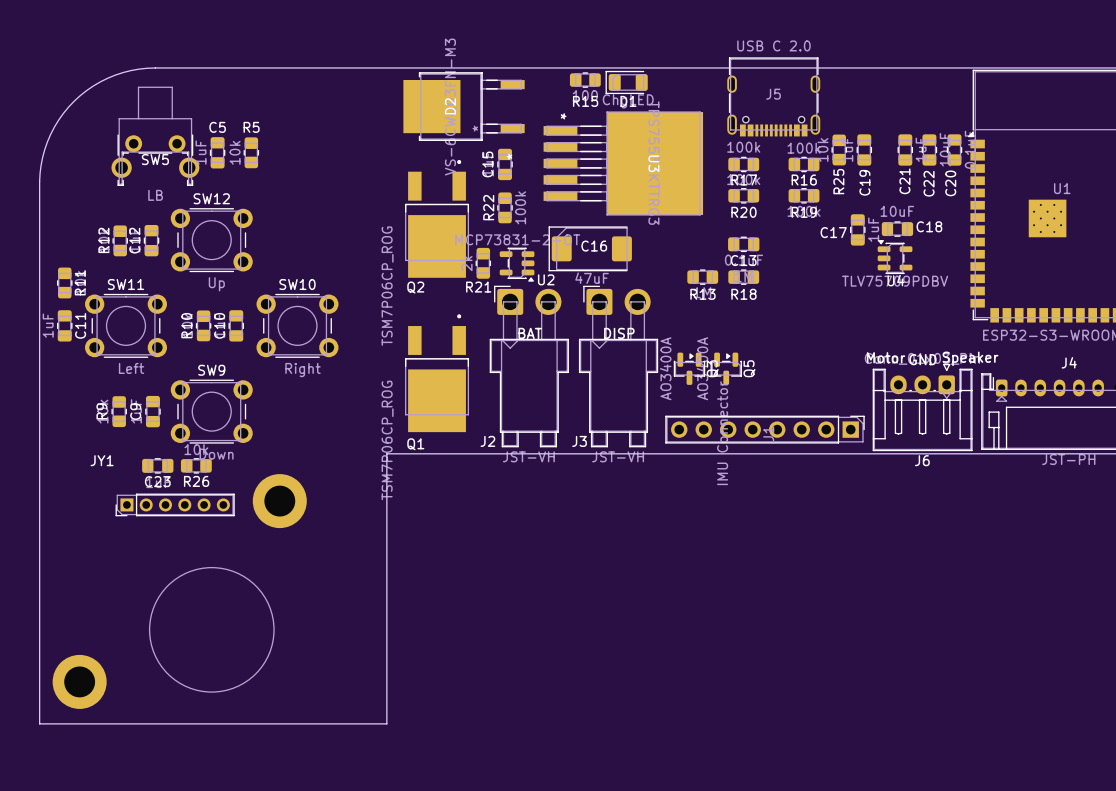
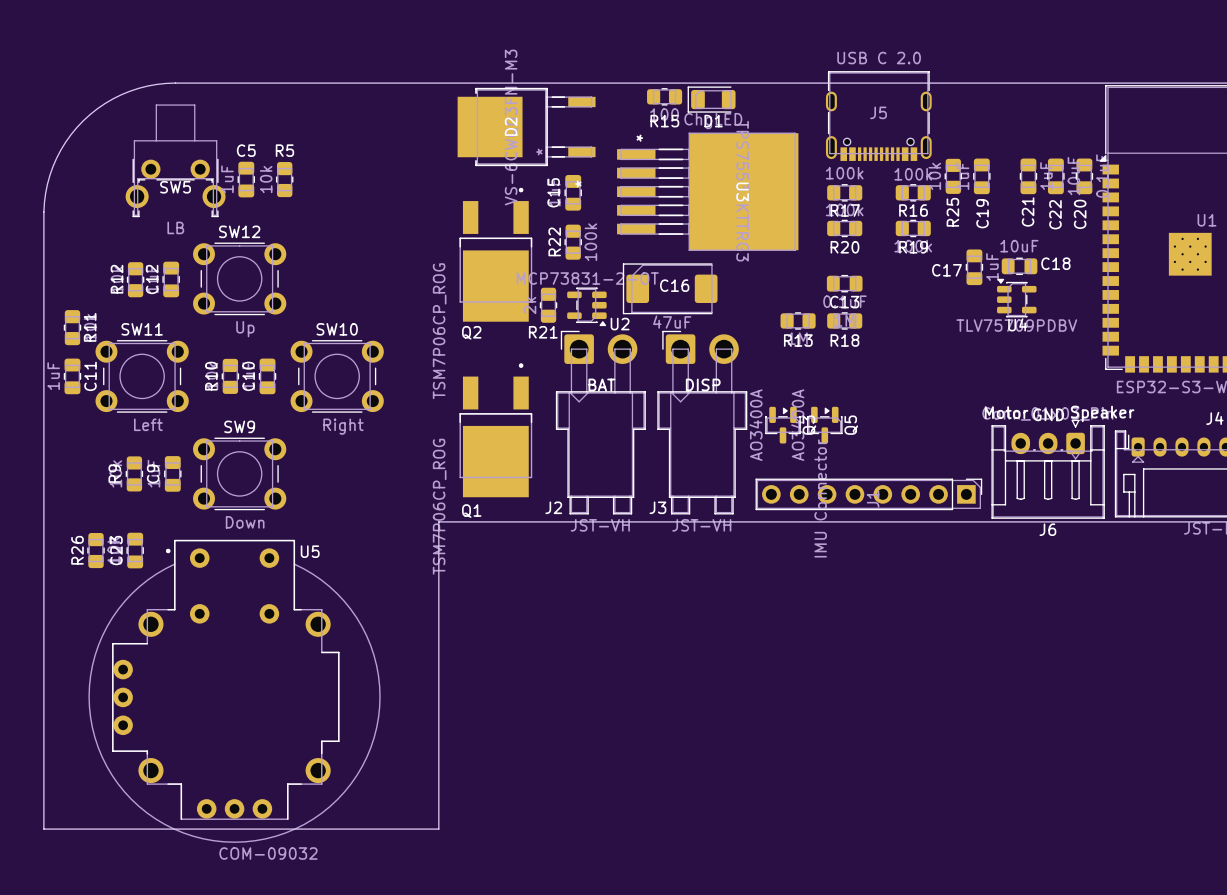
C23 rotation: 0° (157, 465) -> 90° clockwise (135, 550)
C23 position: (157, 465) -> (135, 550)
R26 rotation: 0° (196, 465) -> 90° clockwise (96, 550)
R26 position: (196, 465) -> (96, 550)
JY1: (179, 591) -> none
U5: none -> COM-09032 (234, 691)

